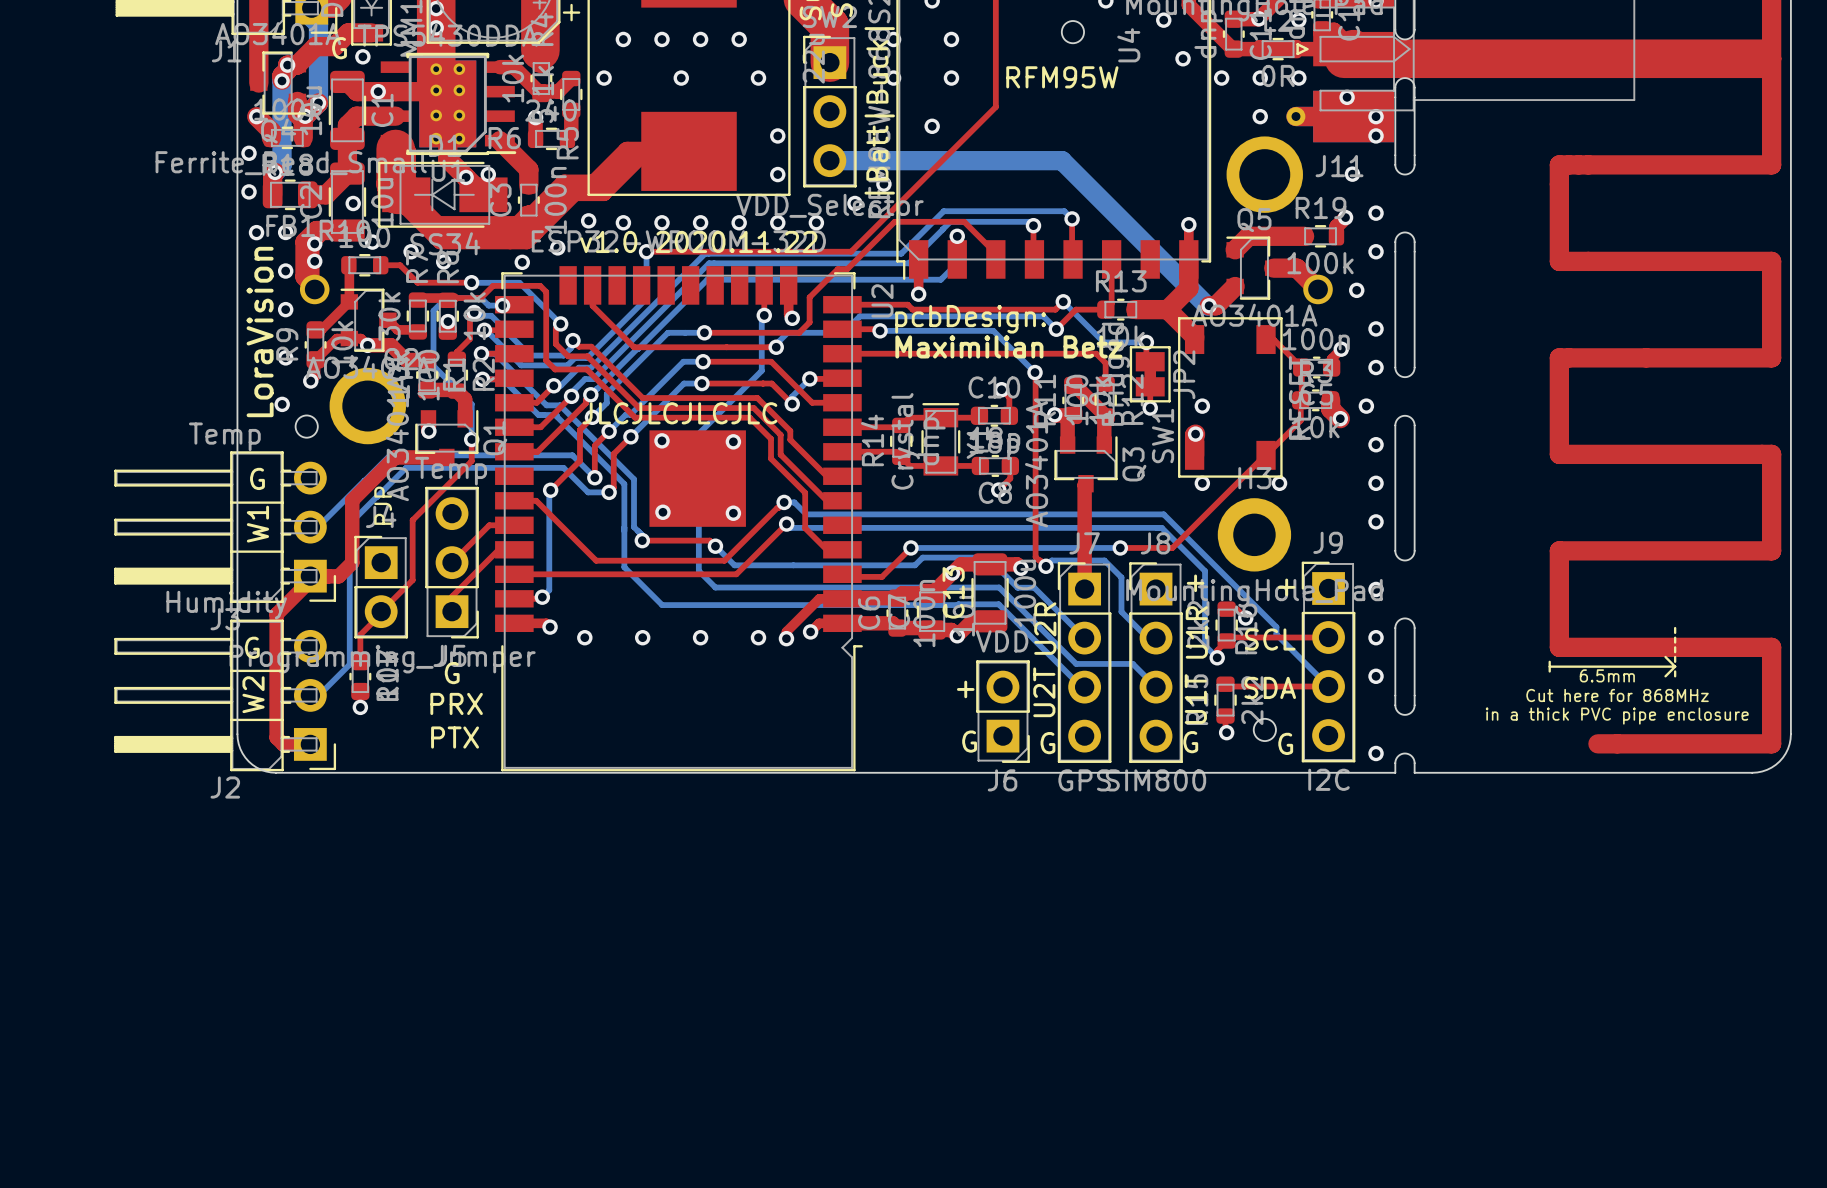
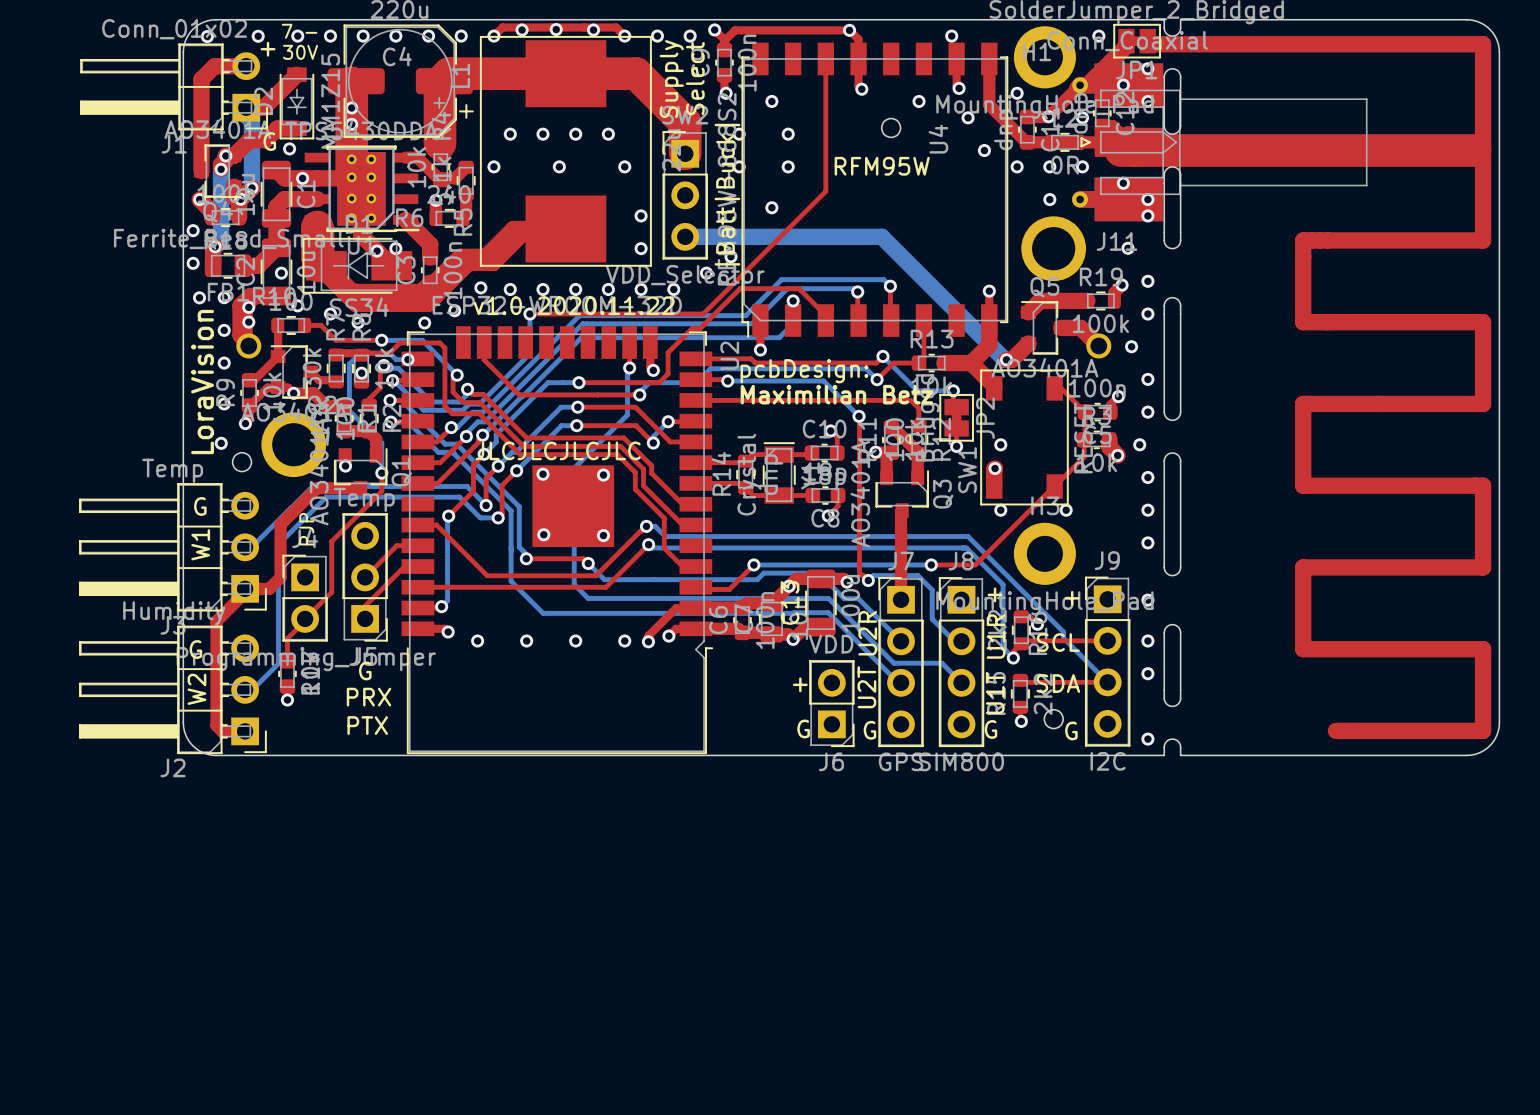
line: (1675, 628) (1675, 632) -> none
line: (1675, 637) (1675, 642) -> none
line: (1675, 647) (1675, 652) -> none
line: (1665, 657) (1675, 666) -> none
line: (1675, 657) (1675, 661) -> none
line: (1549, 661) (1549, 671) -> none
line: (1549, 666) (1675, 666) -> none
line: (1675, 666) (1665, 676) -> none
line: (1675, 671) (1675, 676) -> none
text: 6.5mm (1607, 675) -> none
text: Cut here for 868MHz (1617, 695) -> none
text: in a thick PVC pipe enclosure (1617, 716) -> none

